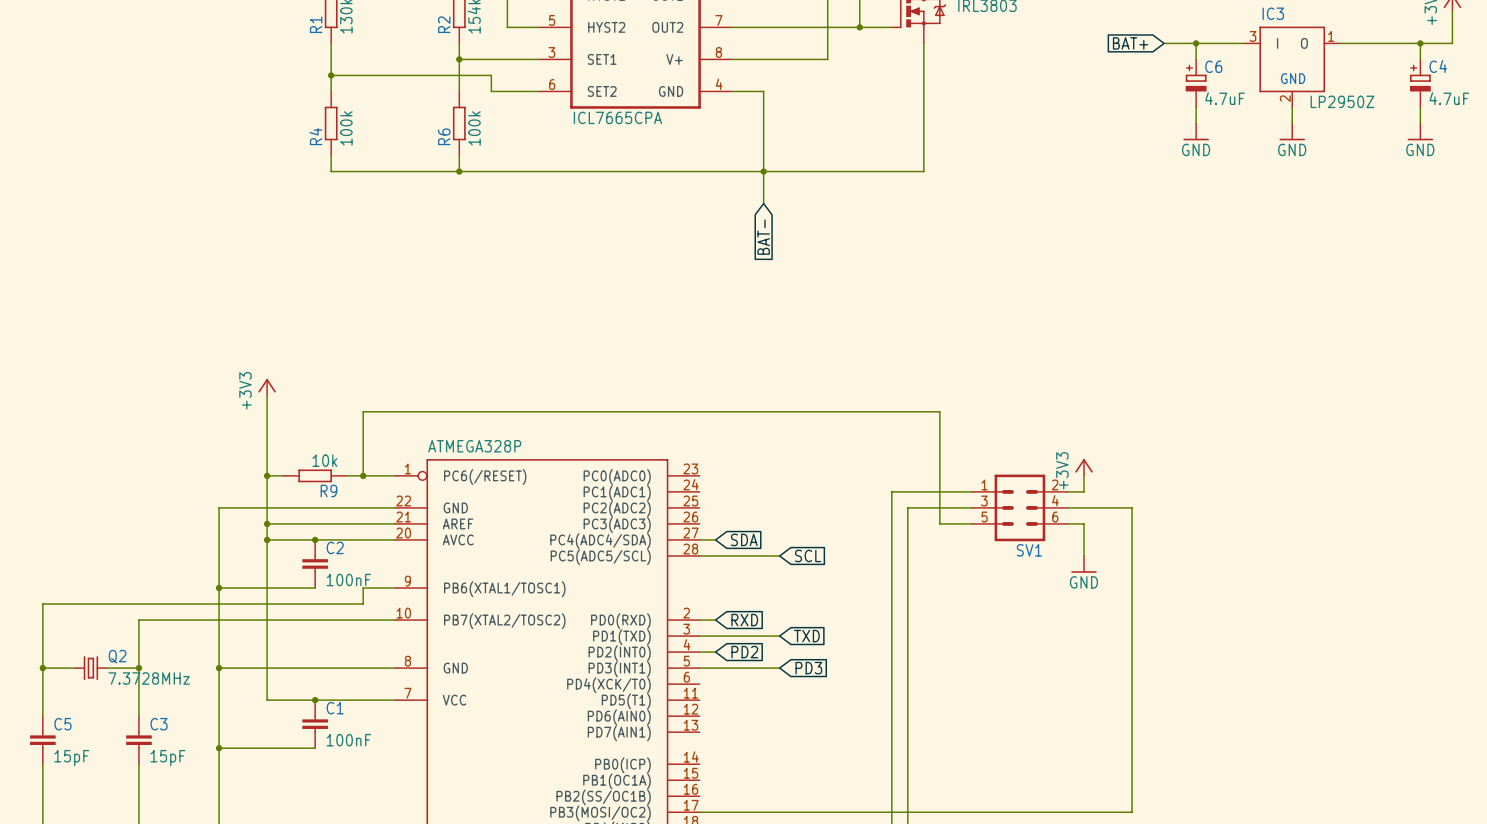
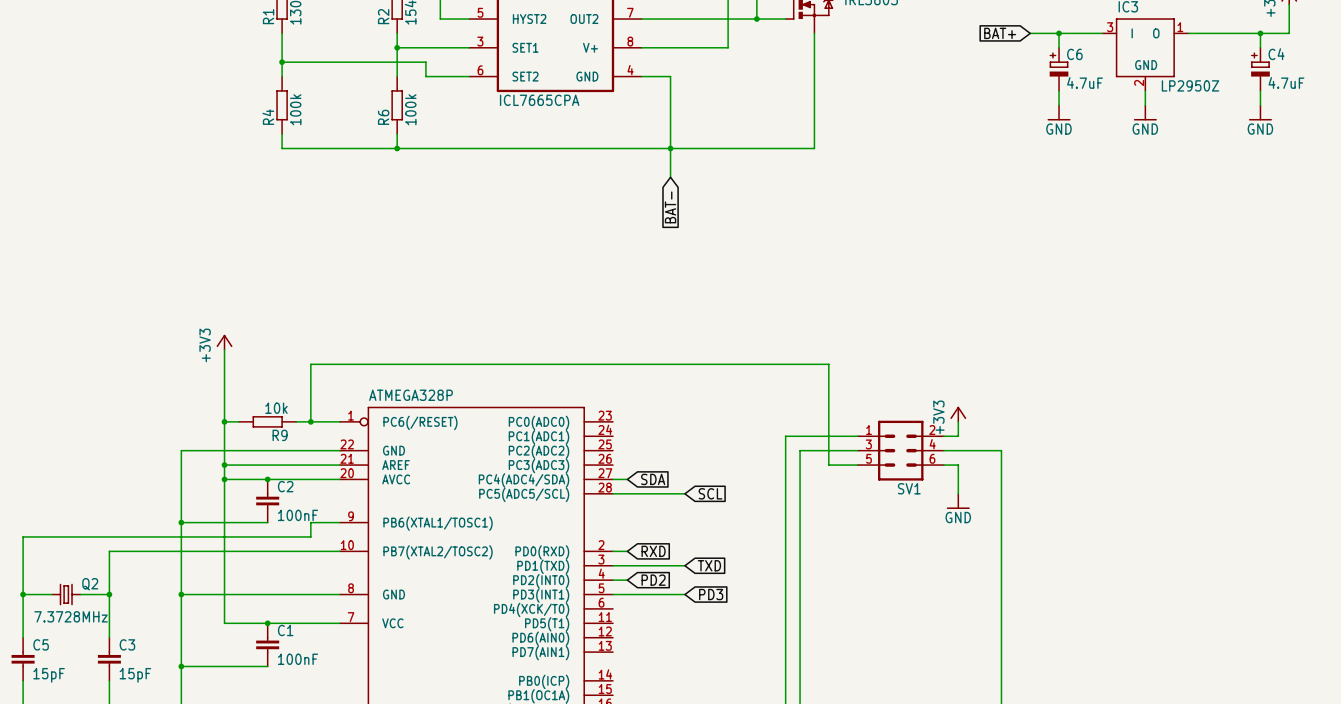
Q2 value position: 7.3728MHz (149, 678) -> 7.3728MHz (71, 616)

